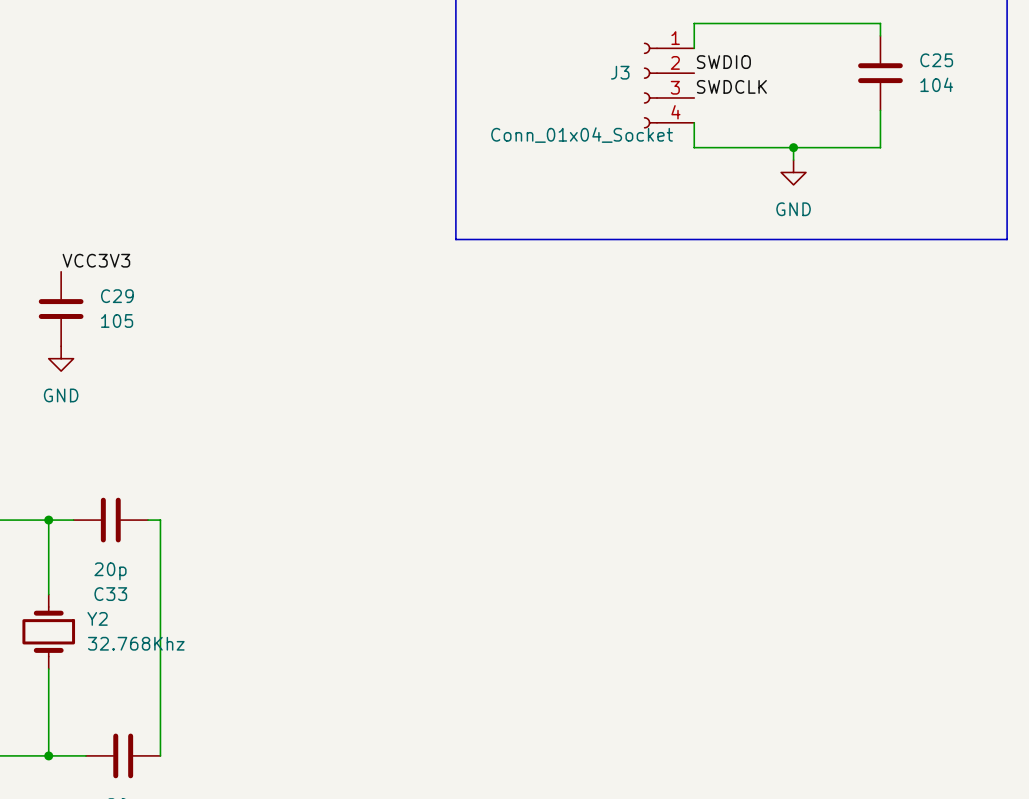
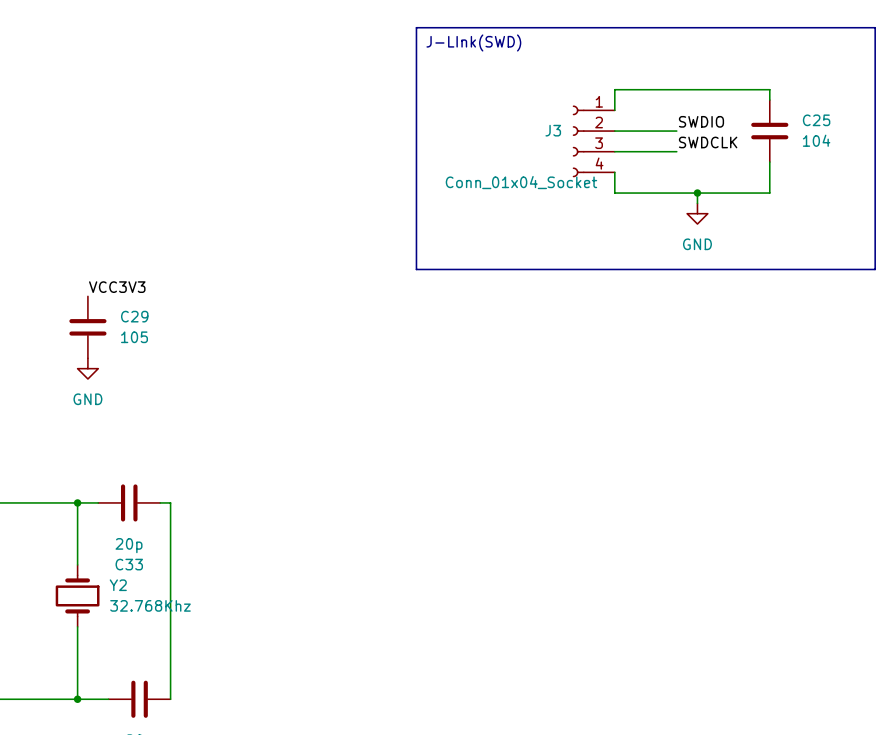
label position: SWDIO (723, 62) -> SWDIO (701, 121)
wire: none -> (614, 131) (676, 131)
label position: SWDCLK (731, 86) -> SWDCLK (708, 142)
wire: none -> (614, 151) (676, 151)

